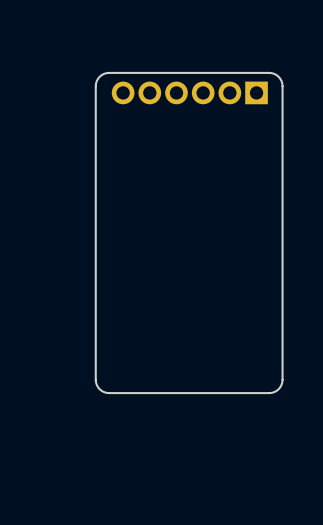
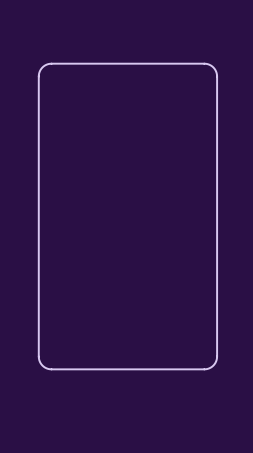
part: (189, 92) -> none

